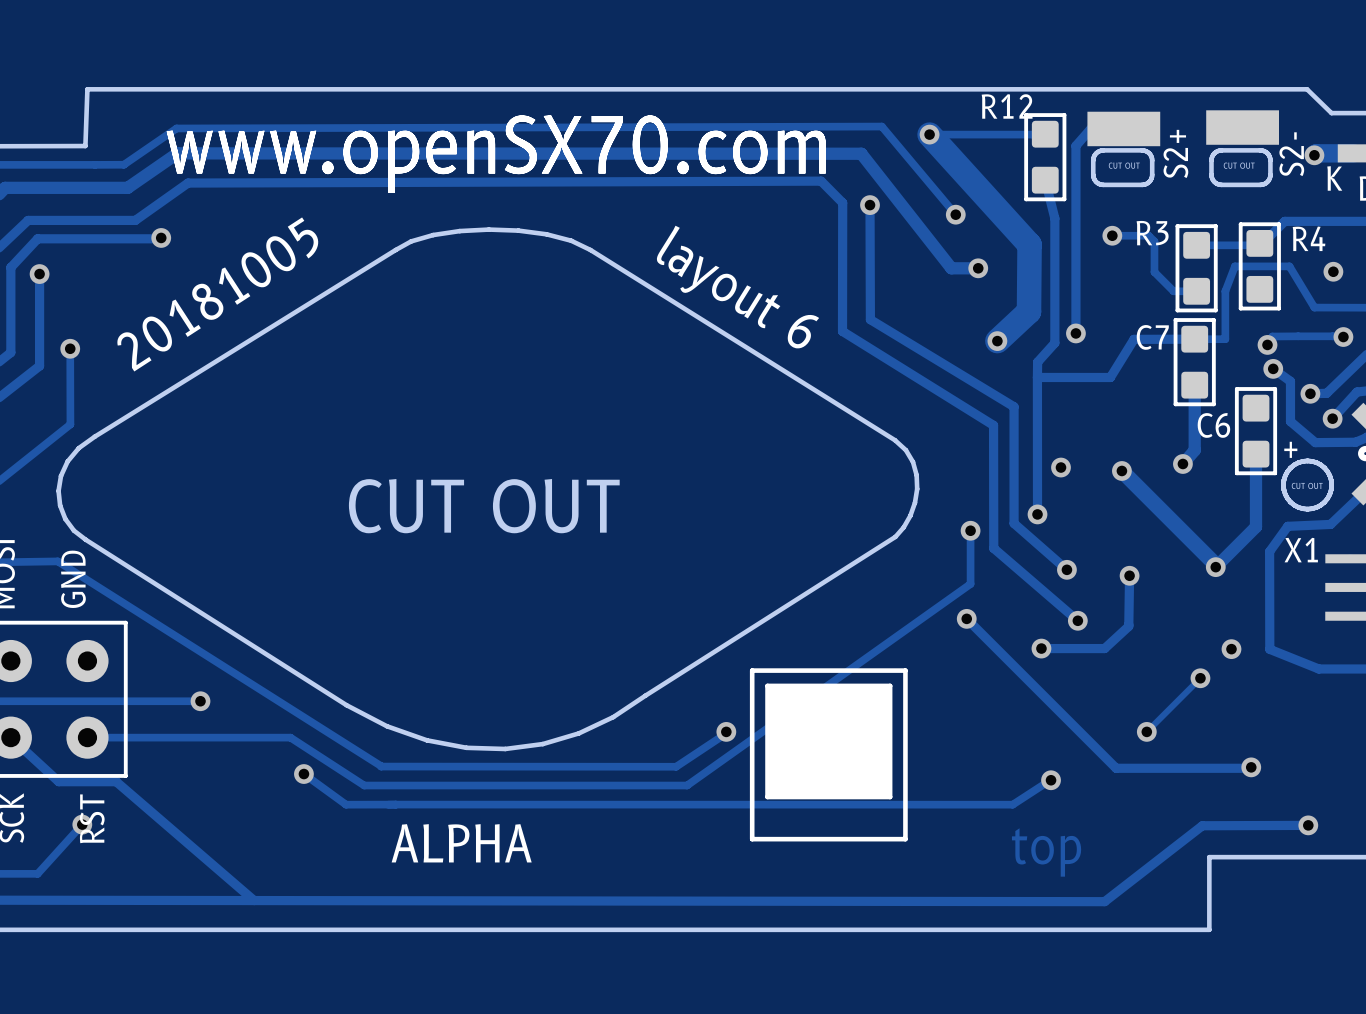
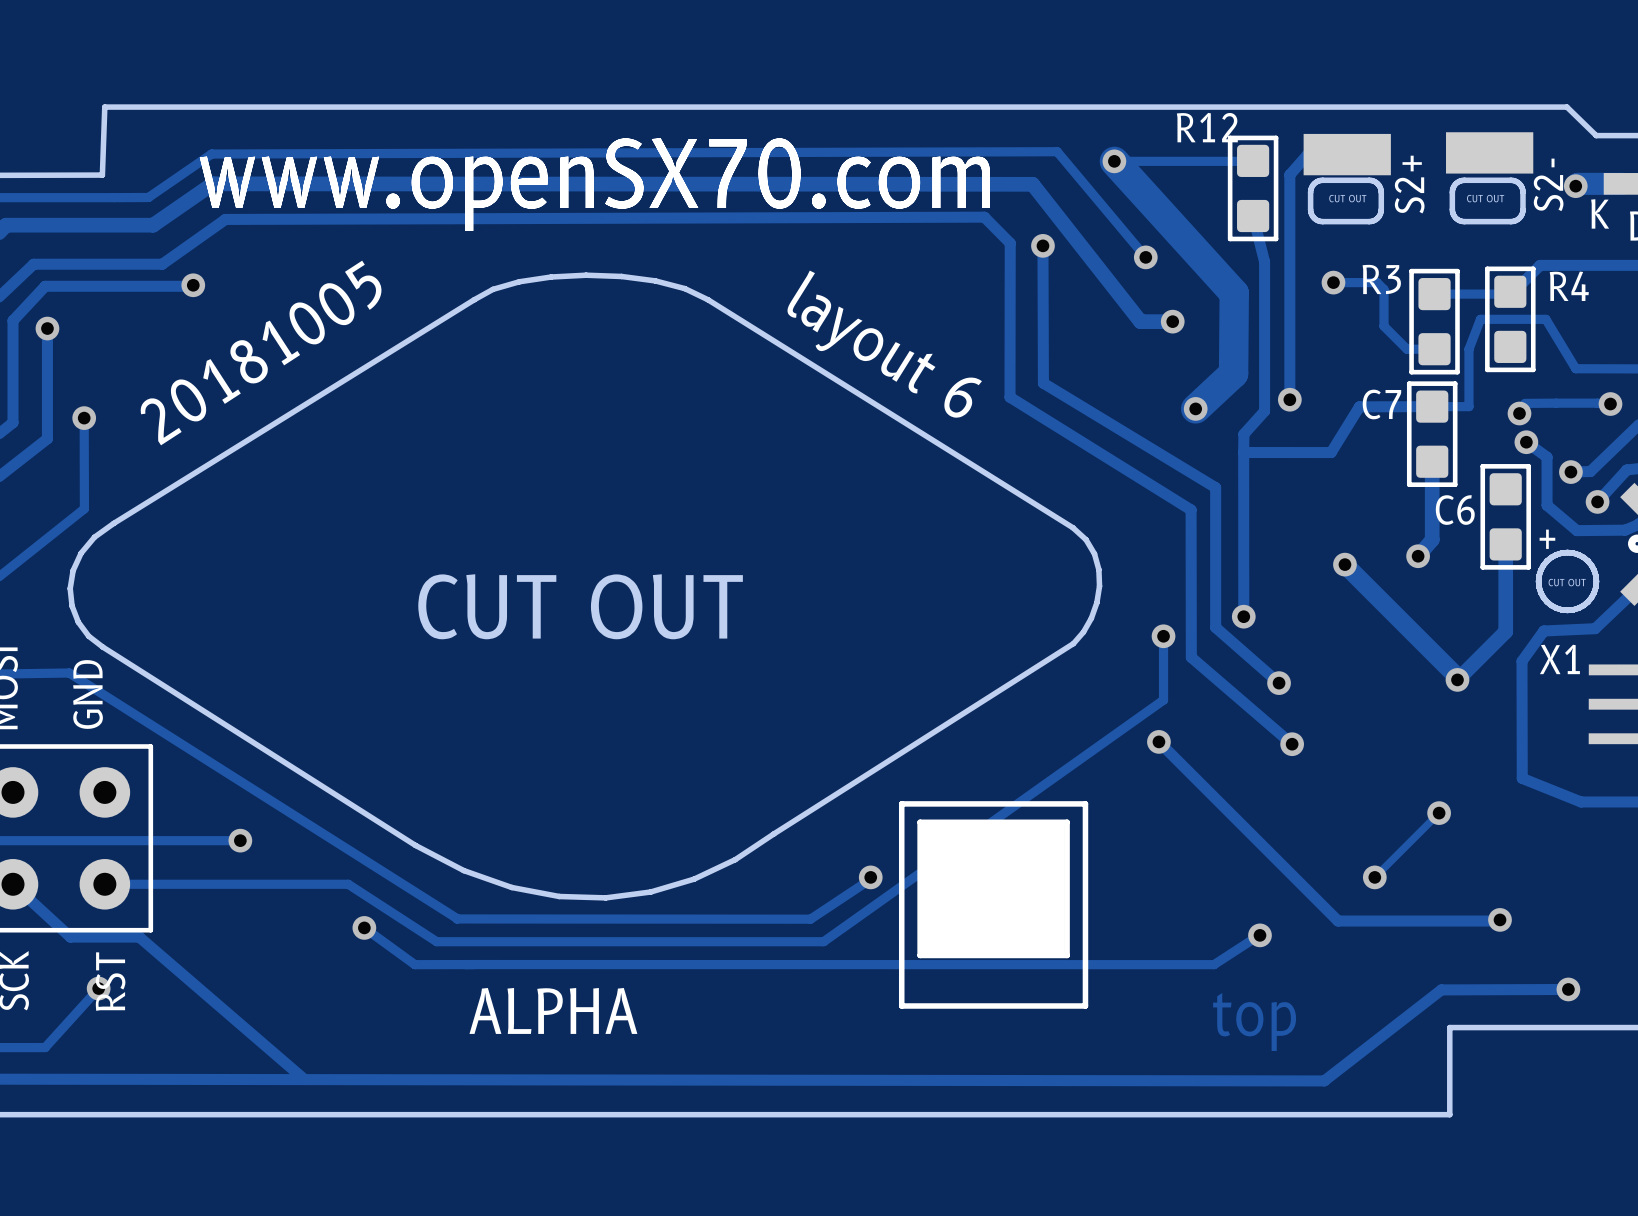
via: (1333, 271) -> none
via: (1060, 467) -> none
track: (1129, 575) (1128, 626) (1104, 648) (1041, 648) -> none
via: (1129, 575) -> none
via: (1041, 648) -> none
via: (1231, 649) -> none

